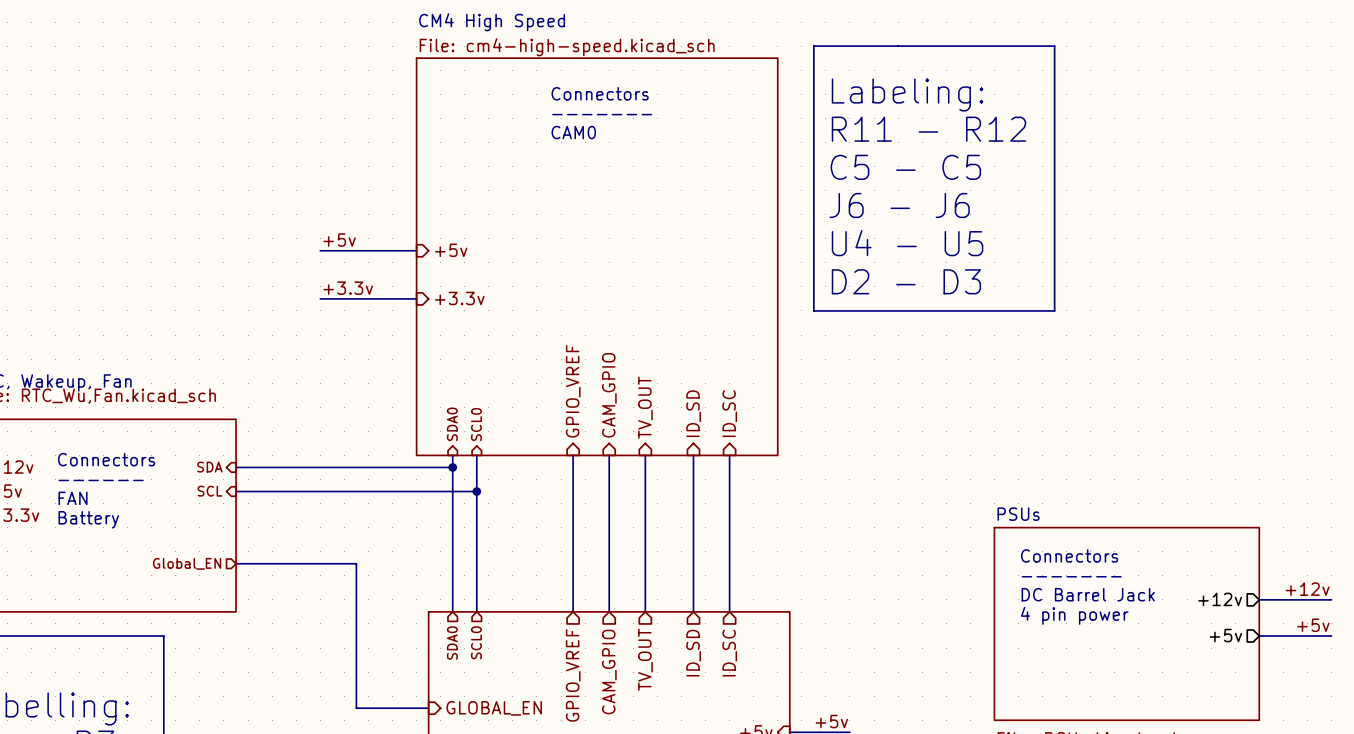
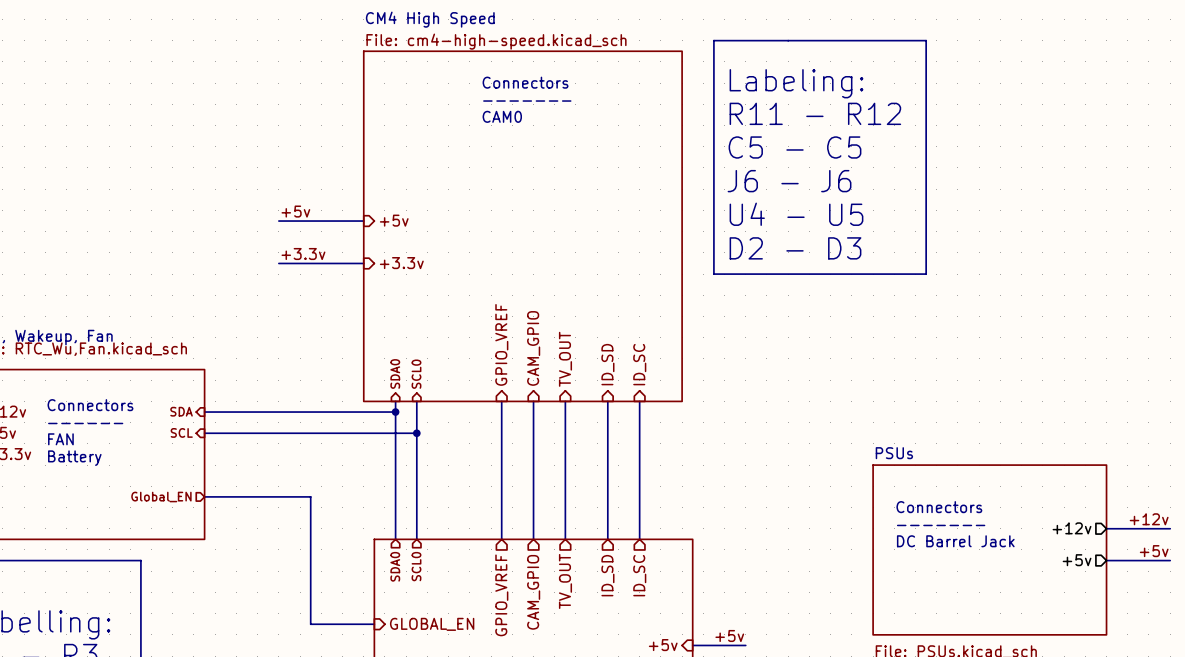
text: Connectors (1069, 555) -> none
text: ------- (1071, 576) -> Connectors (939, 507)
text: DC Barrel Jack (1088, 594) -> ------- (941, 525)
text: 4 pin power (1074, 615) -> DC Barrel Jack (955, 541)

